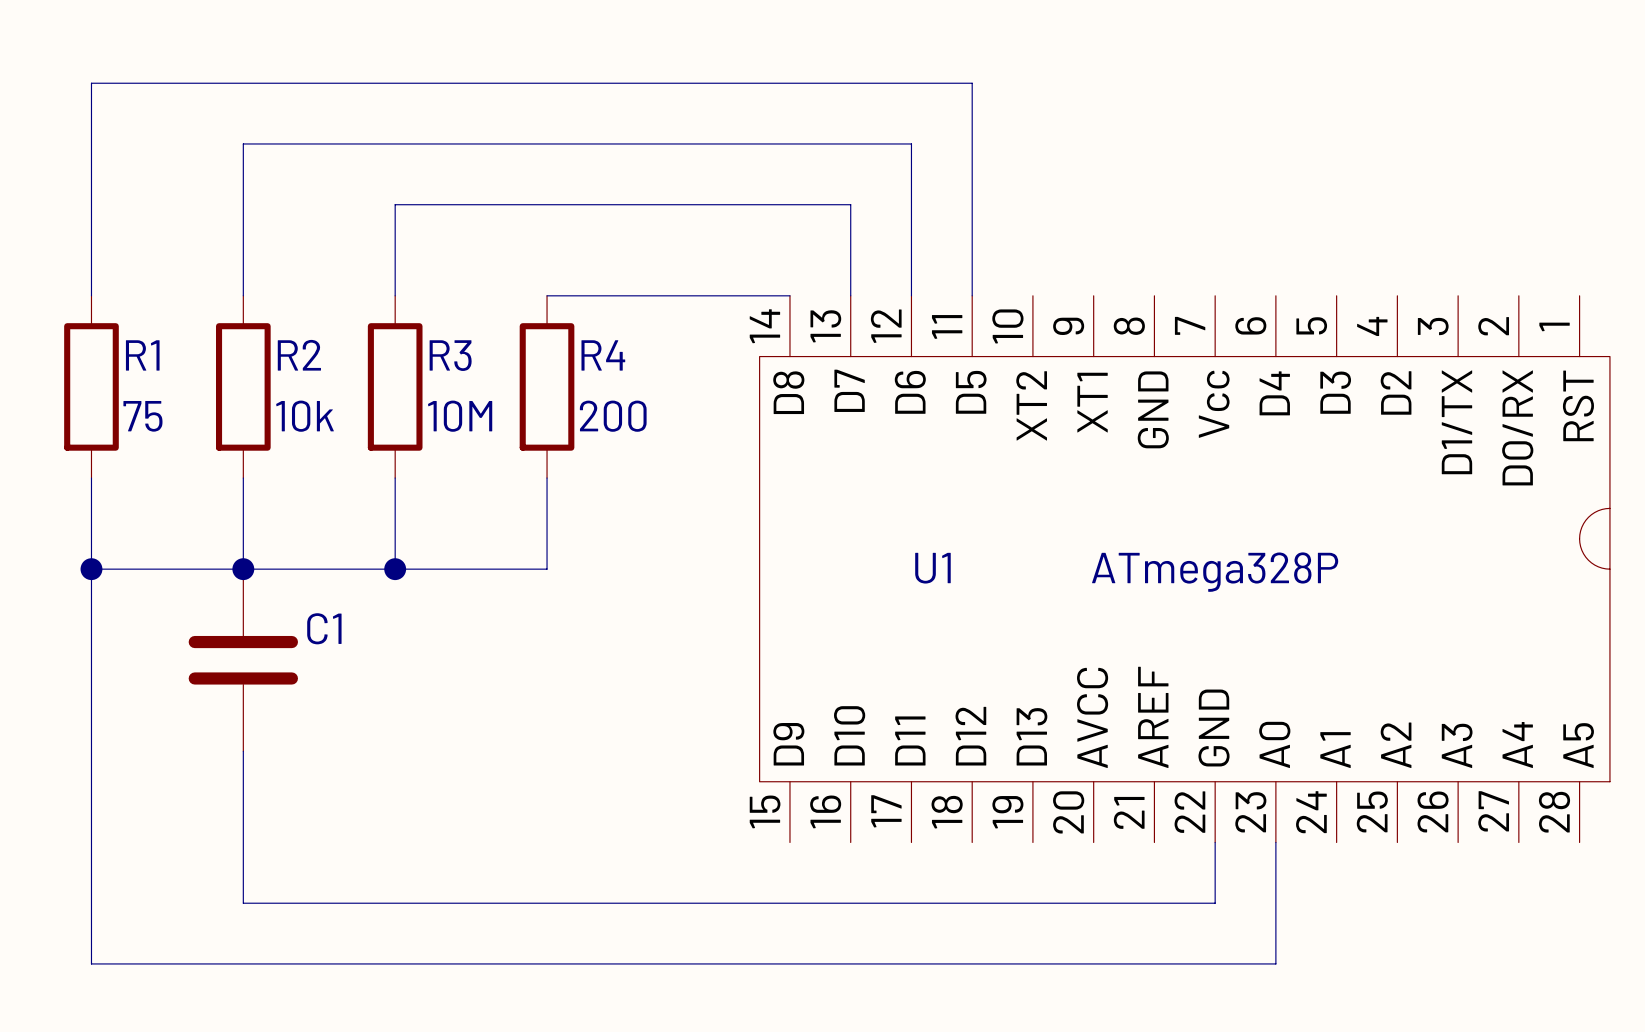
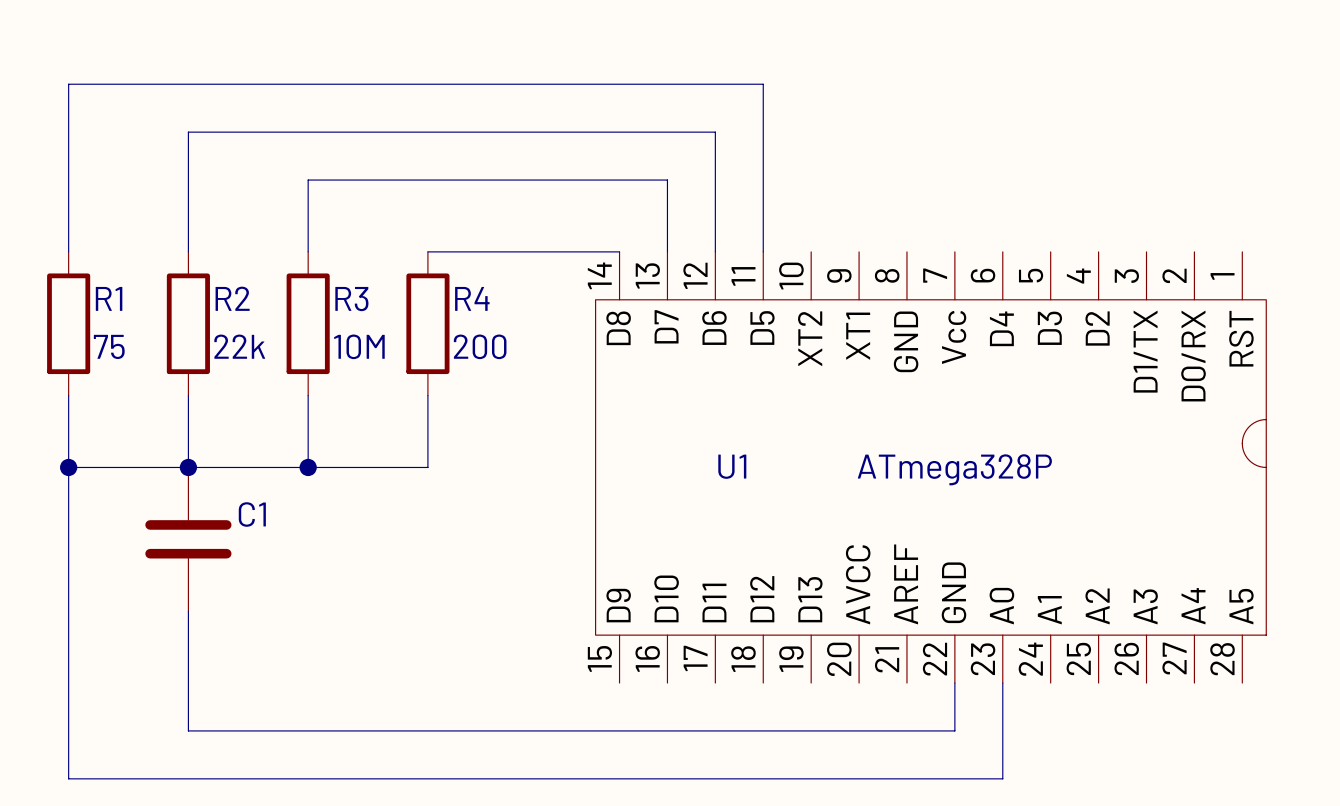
R2 value: 10k (305, 416) -> 22k (239, 346)

